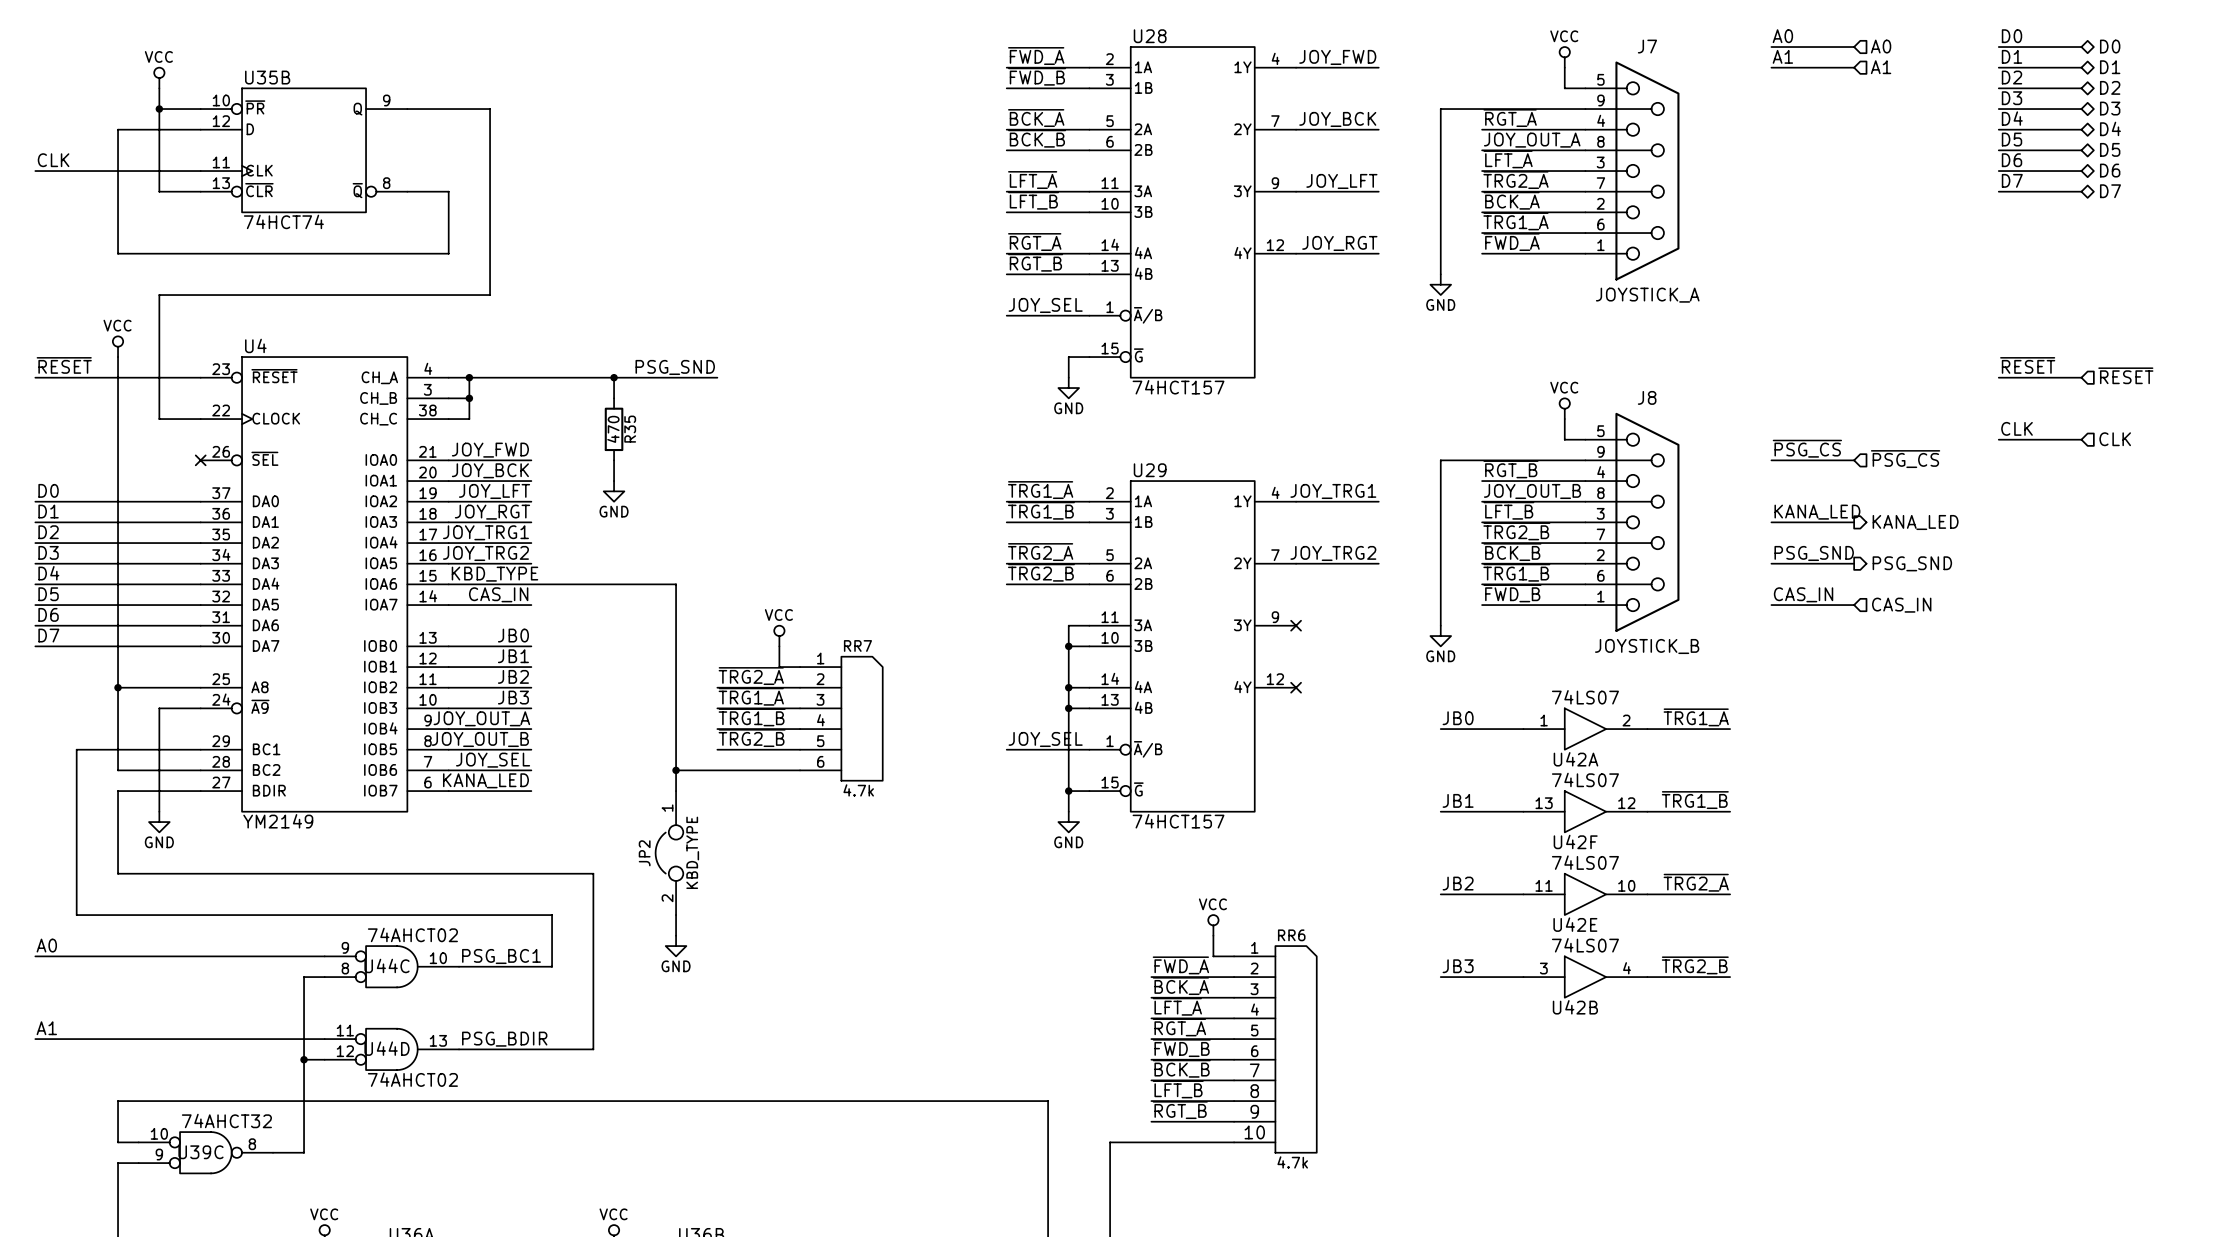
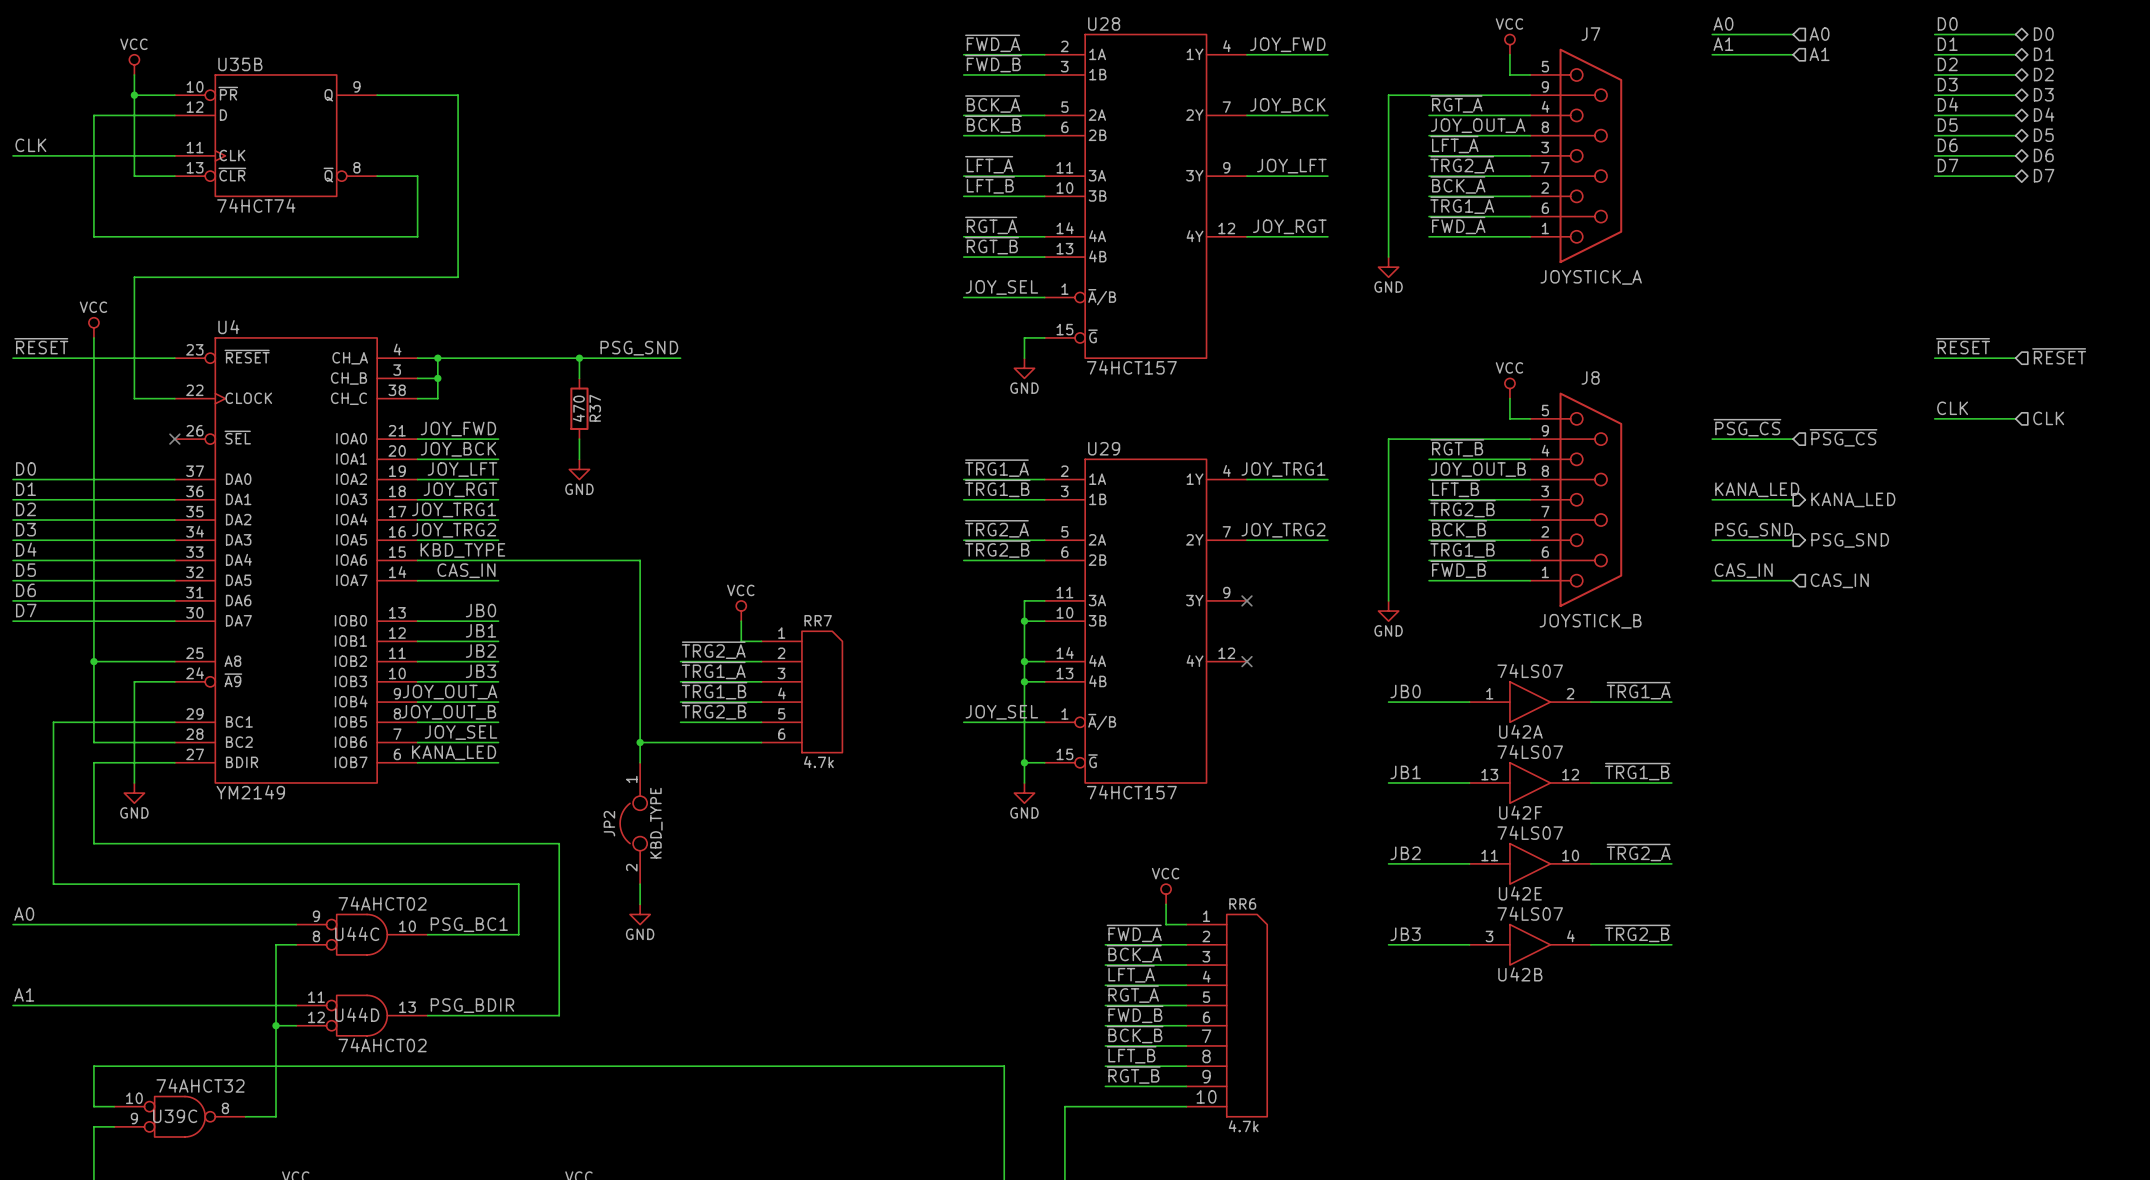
R35 name: R35 (630, 429) -> R37 (595, 408)

